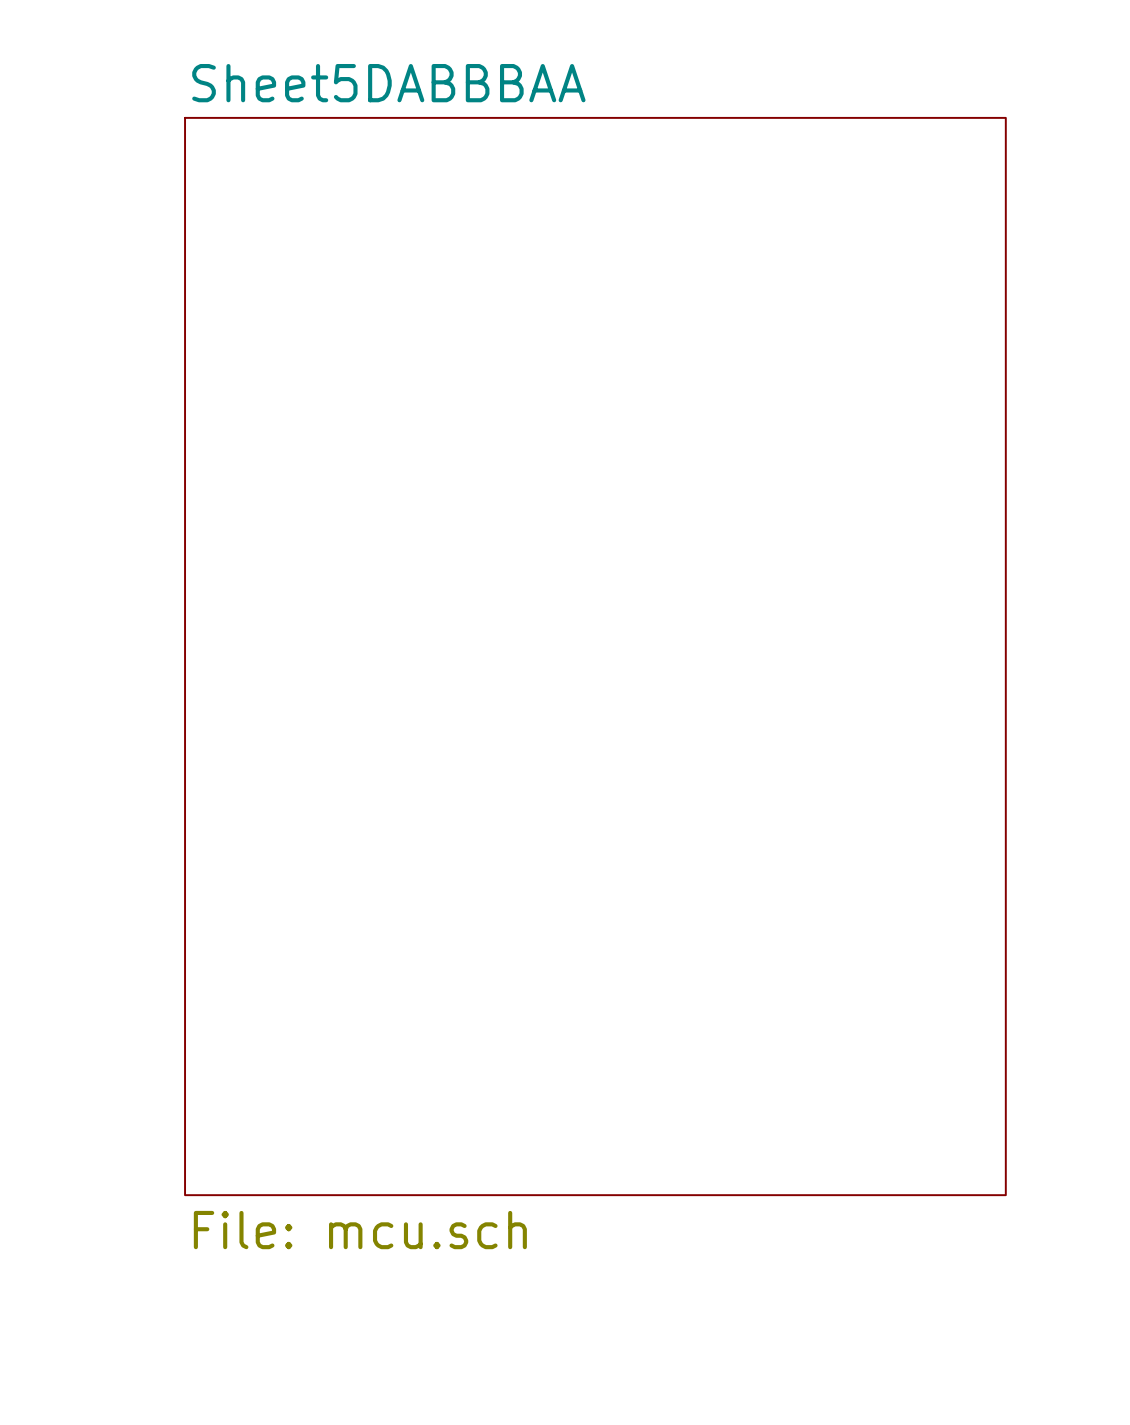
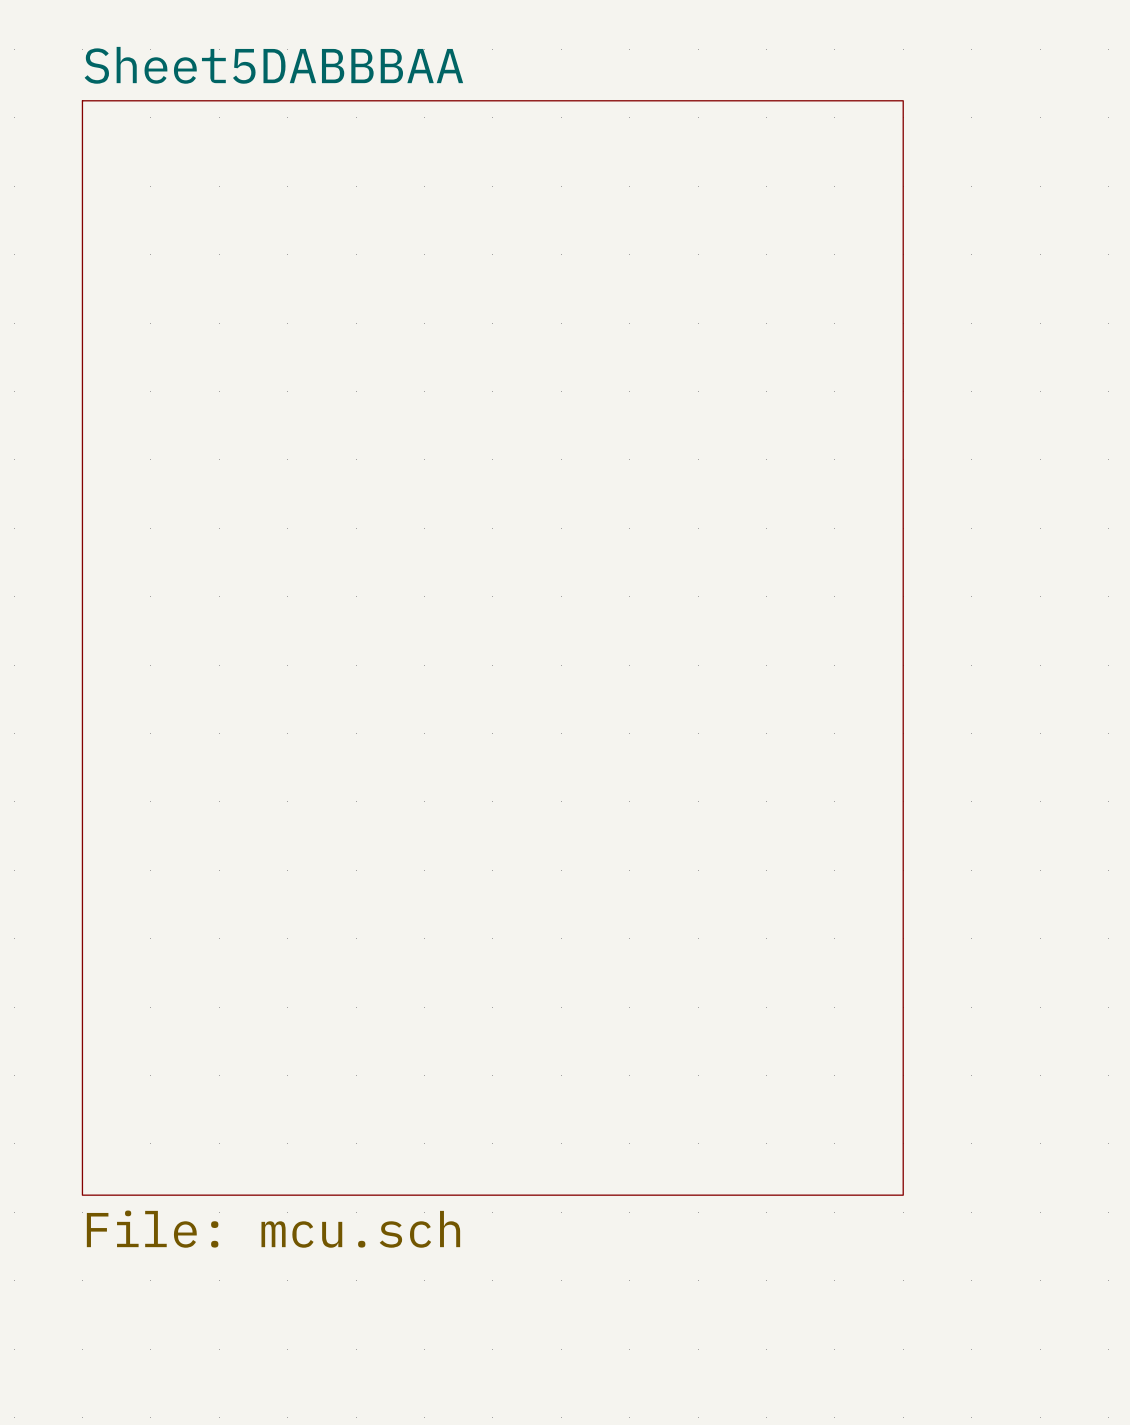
sheet Sheet5DABBBAA shape: [185, 117, 1006, 1196] -> [82, 100, 904, 1196]

